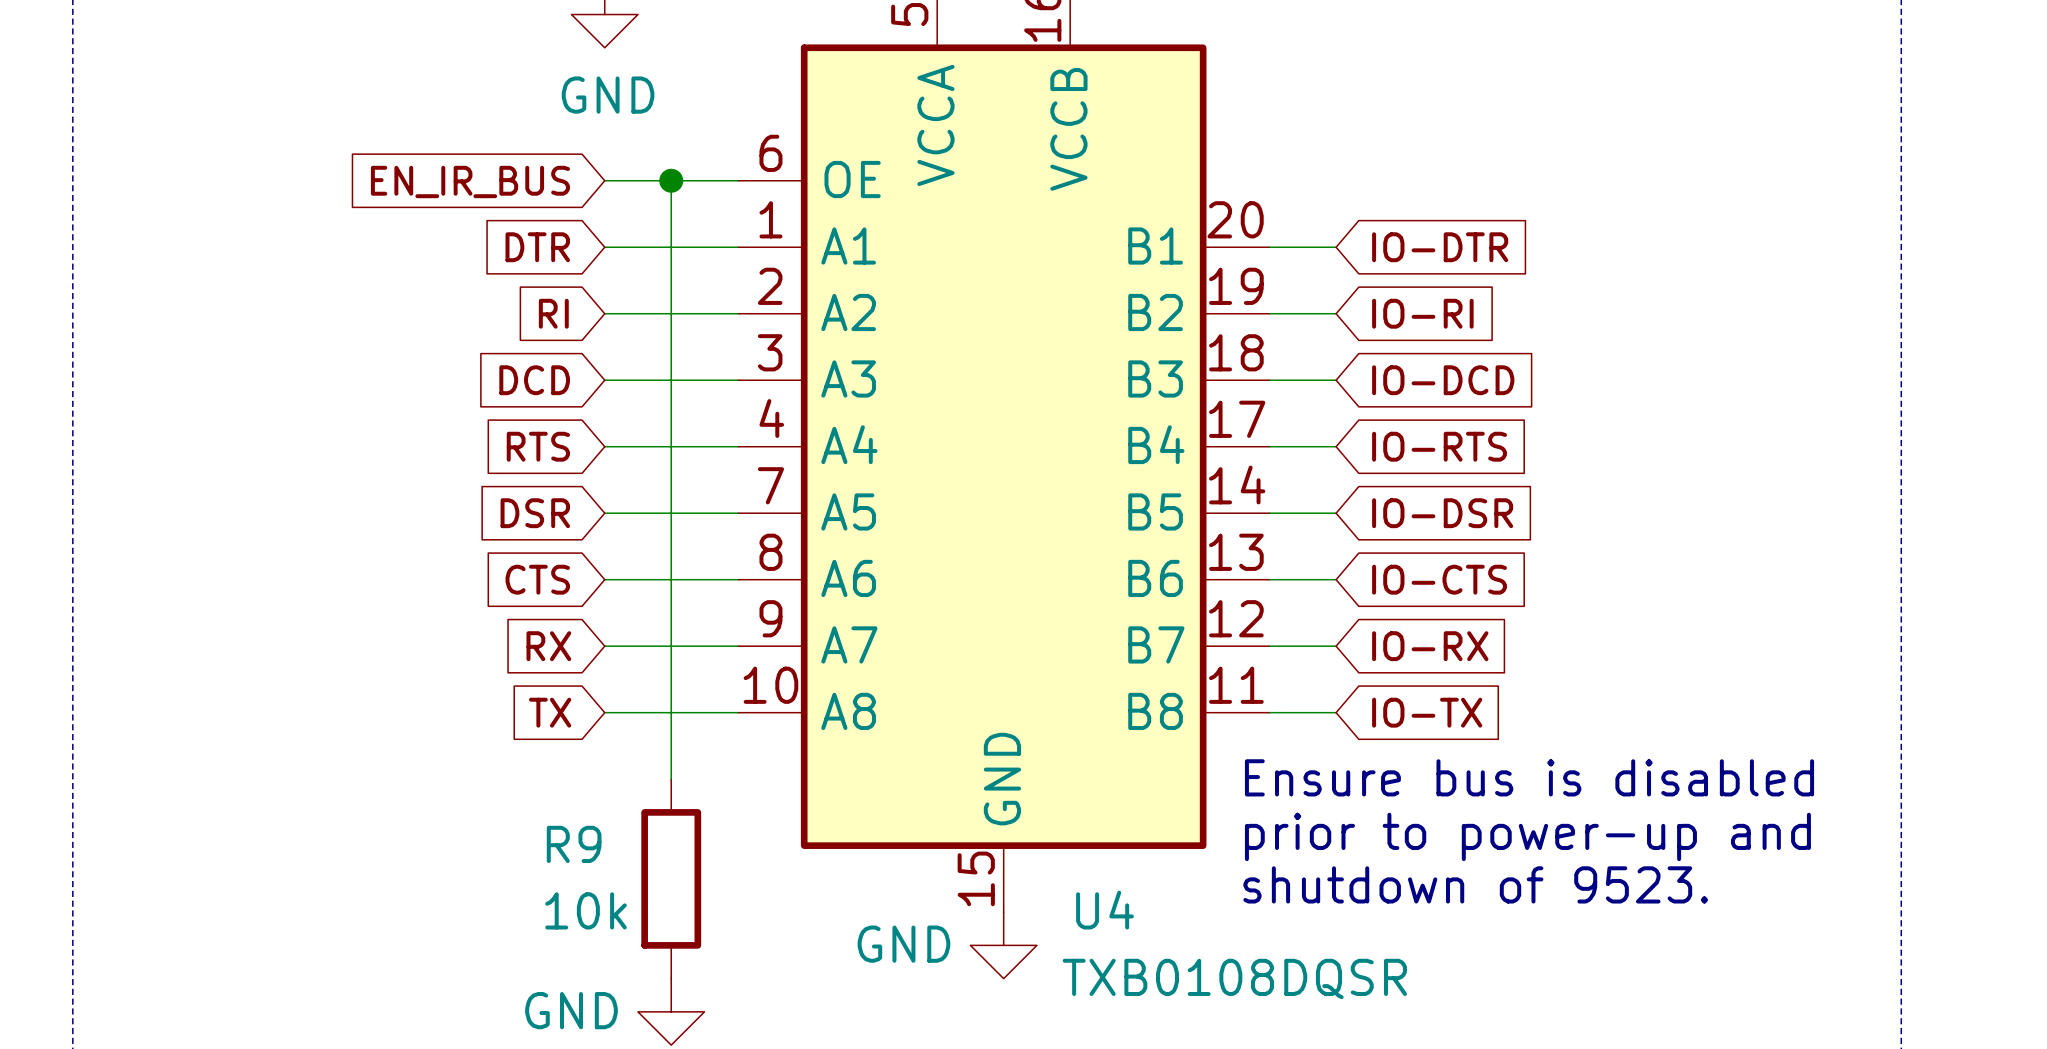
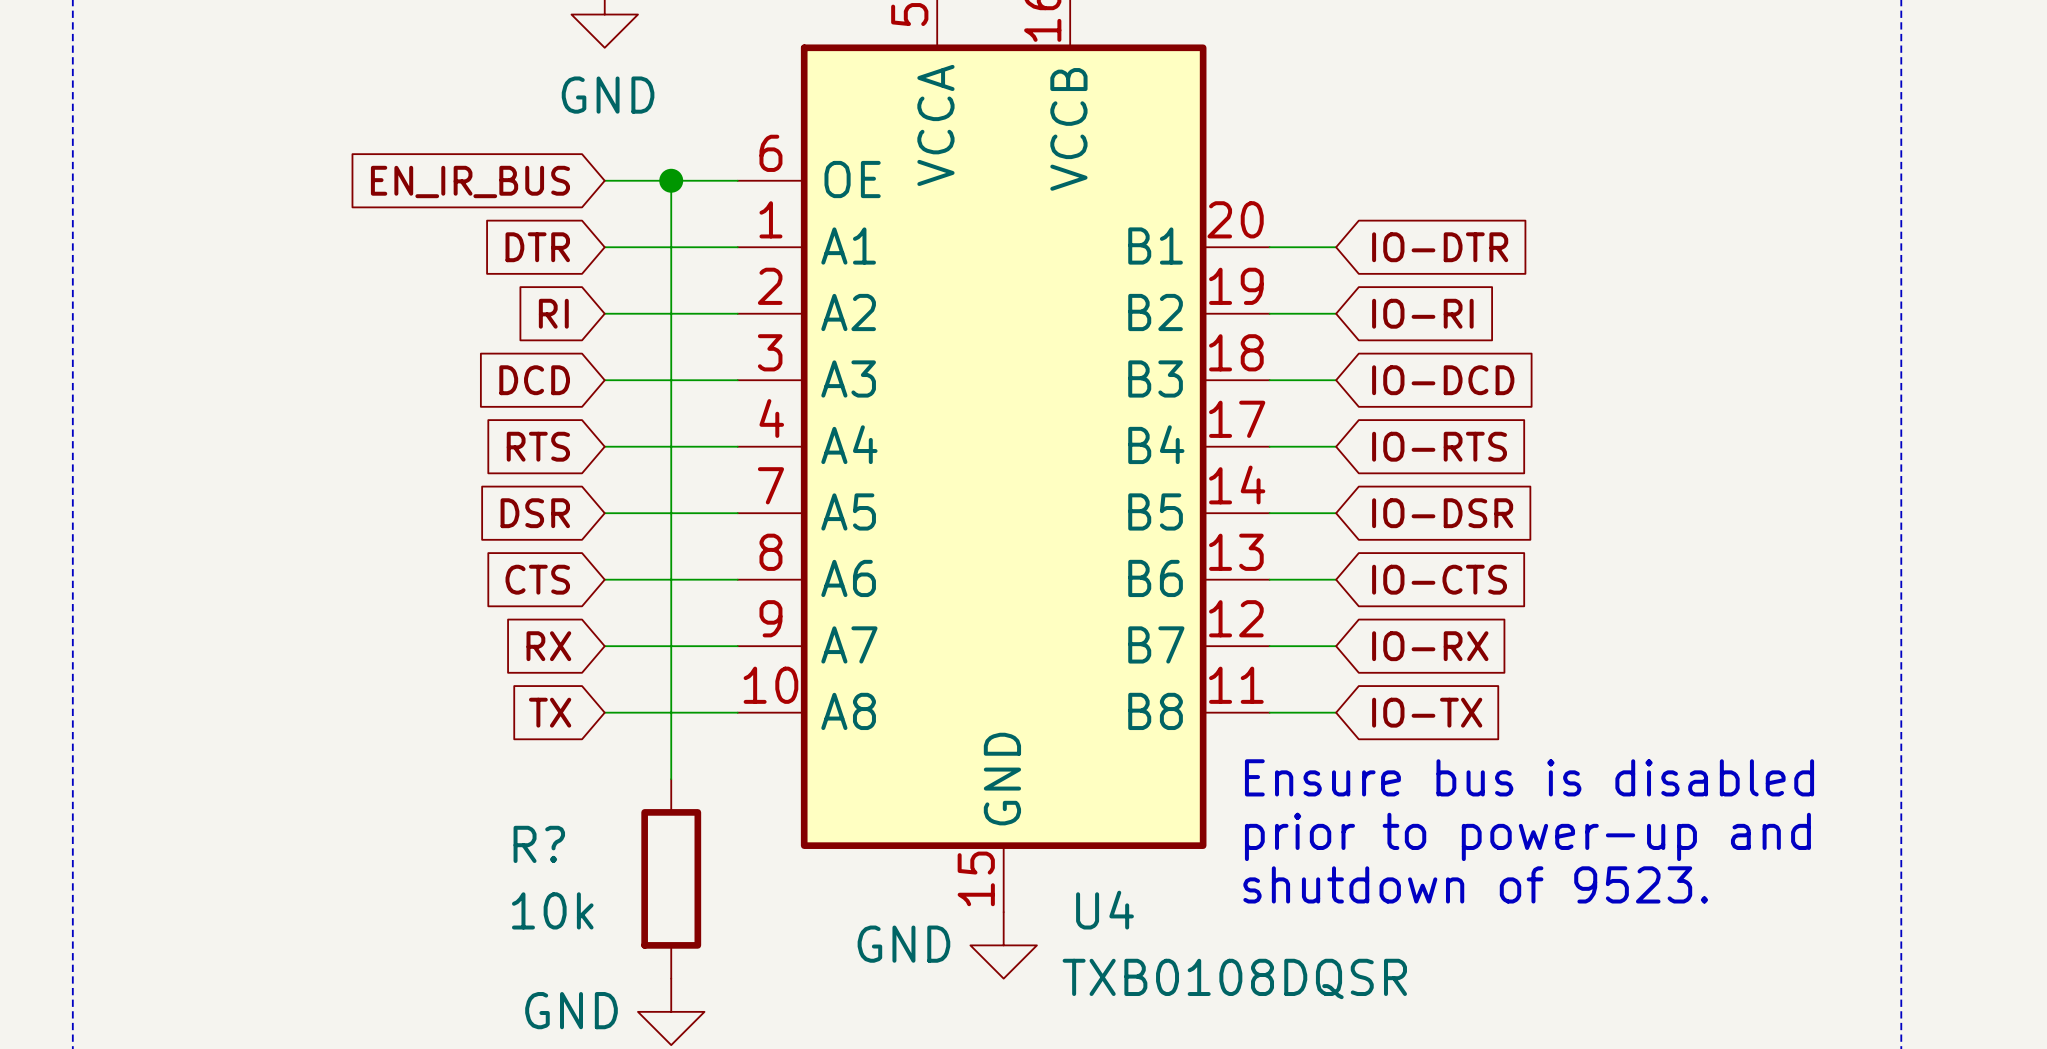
R9 name: R9 (574, 844) -> R? (539, 844)
R9 value position: 10k (585, 910) -> 10k (552, 910)

